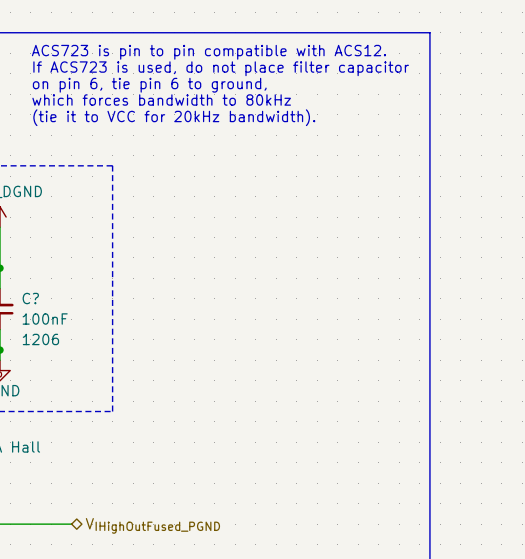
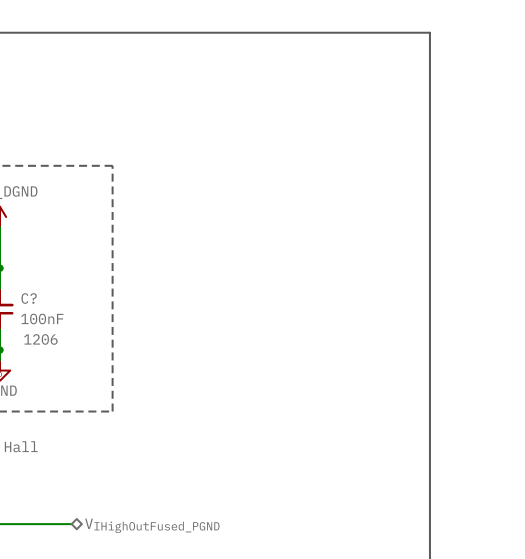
text: ACS723 is pin to pin compatible with ACS12. (208, 52) -> none
text: If ACS723 is used, do not place filter capacitor (221, 68) -> none
text: on pin 6, tie pin 6 to ground, (149, 85) -> none
text: which forces bandwidth to 80kHz (161, 100) -> none
text: (tie it to VCC for 20kHz bandwidth). (174, 117) -> none

